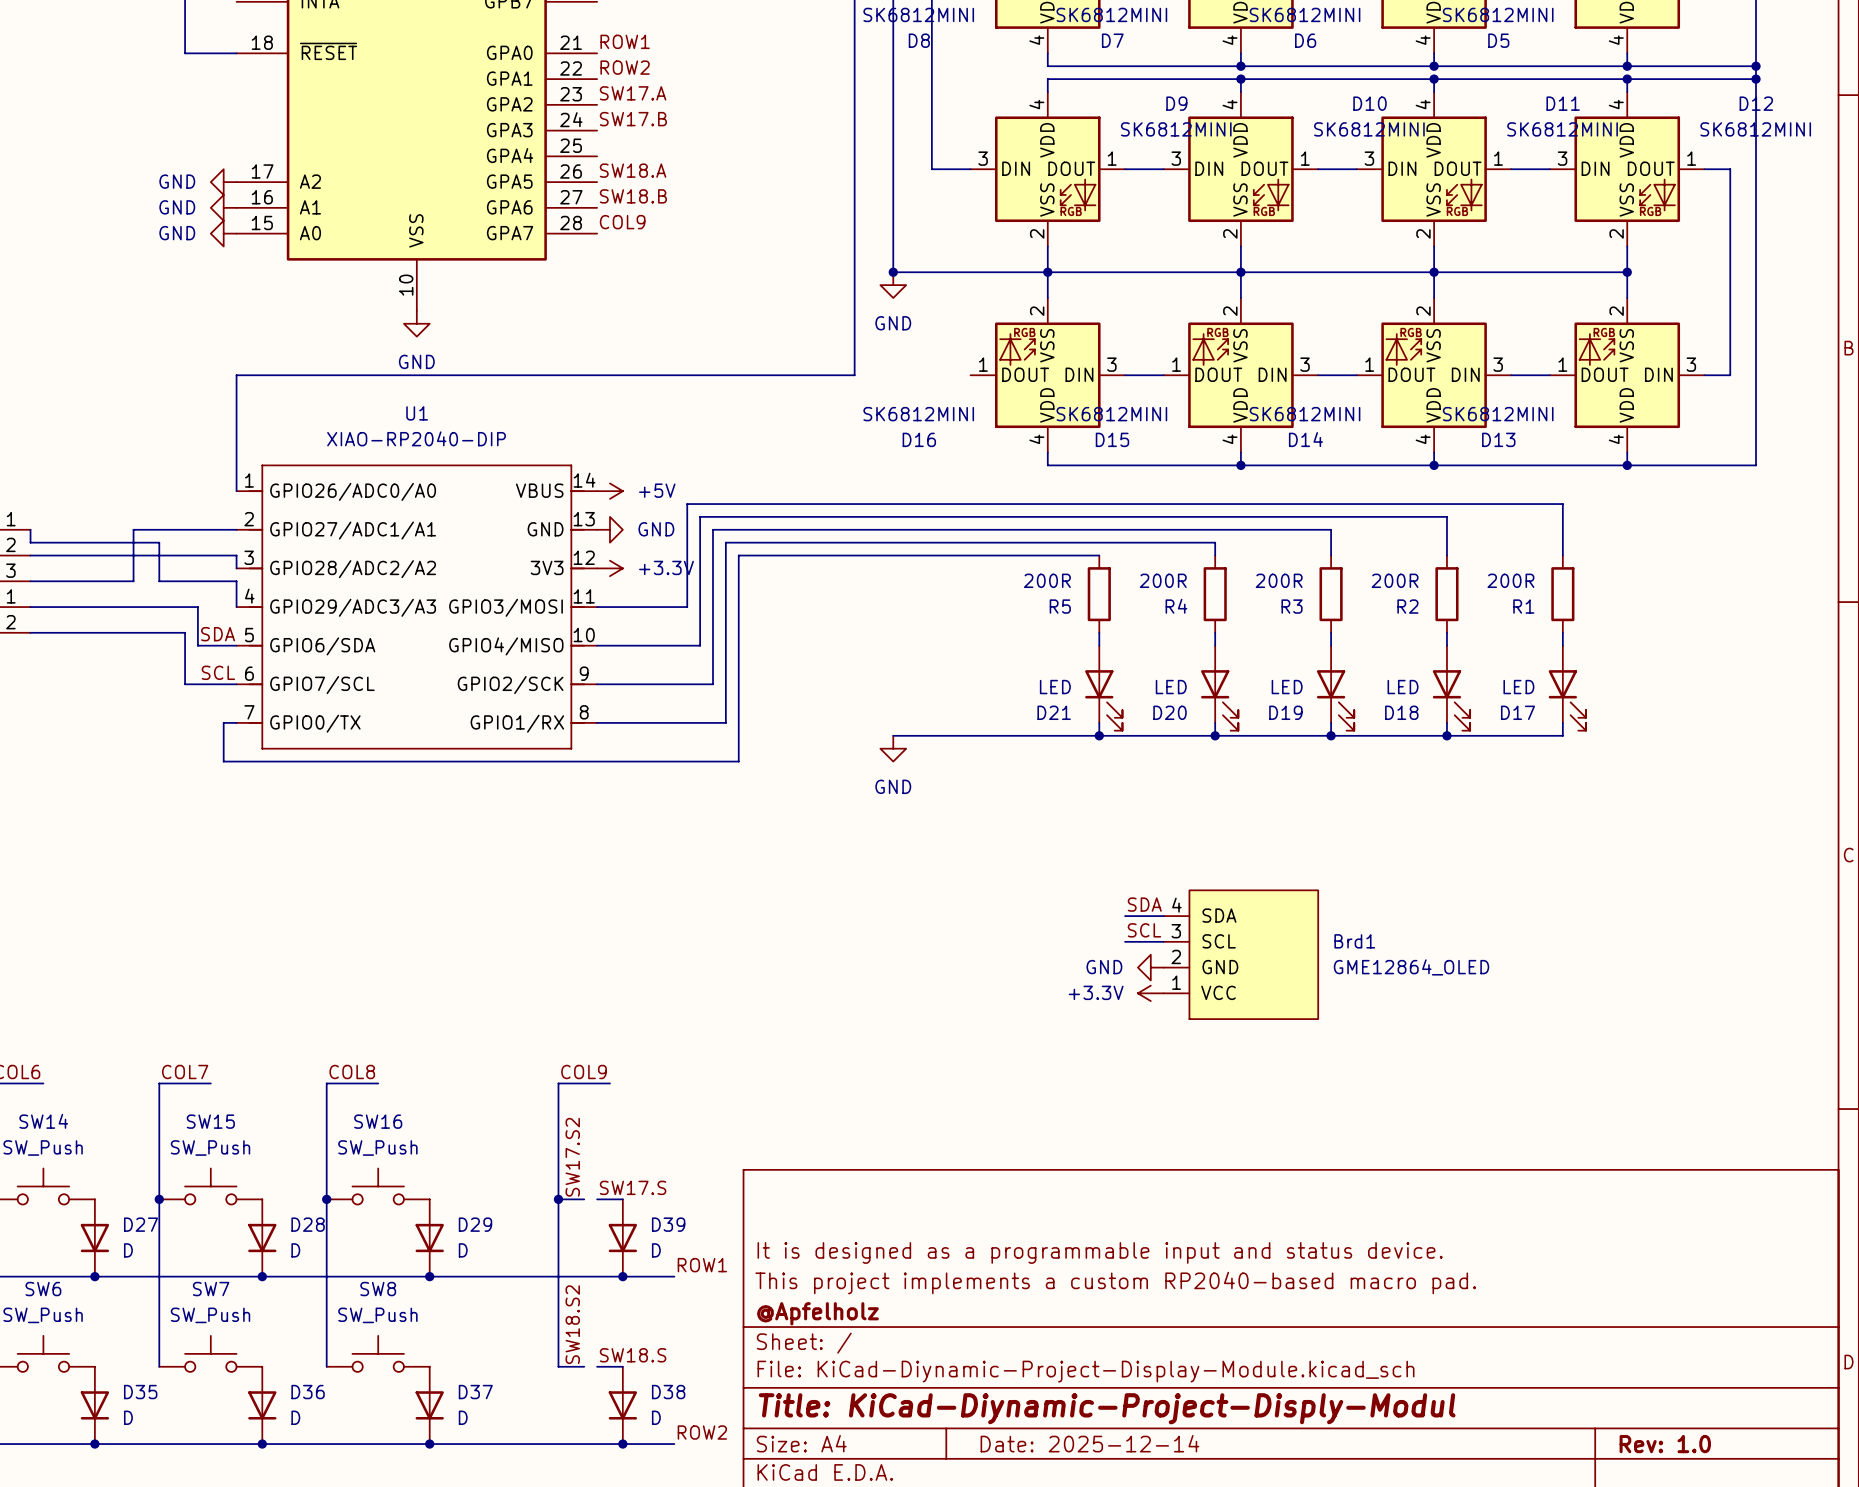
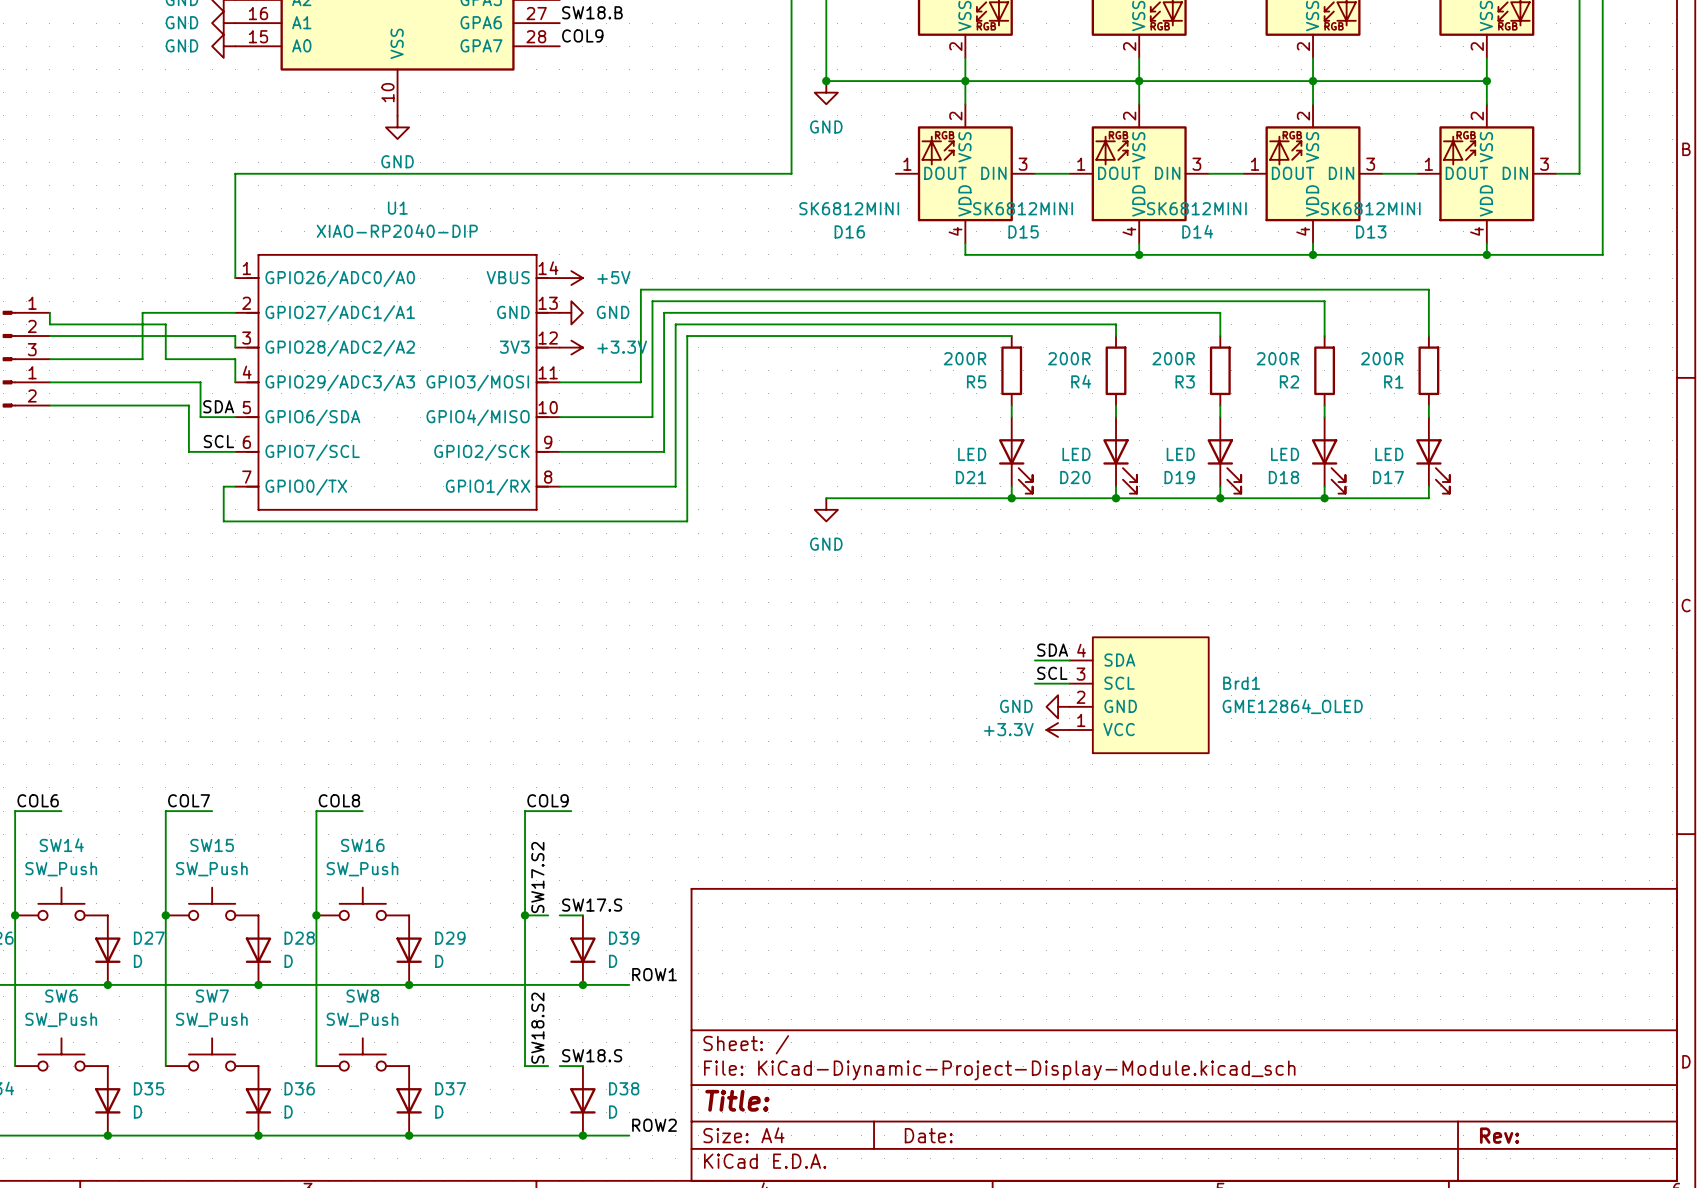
title block: It is designed as a programmable input and status device. (1100, 1252) -> none
title block: This project implements a custom RP2040-based macro pad. (1115, 1283) -> none
title block: @Apfelholz (817, 1313) -> none
title block: Title: KiCad-Diynamic-Project-Disply-Modul (1107, 1408) -> Title: (737, 1100)
title block: Date: 2025-12-14 (1089, 1443) -> Date: (928, 1135)
title block: Rev: 1.0 (1665, 1444) -> Rev: (1499, 1135)

